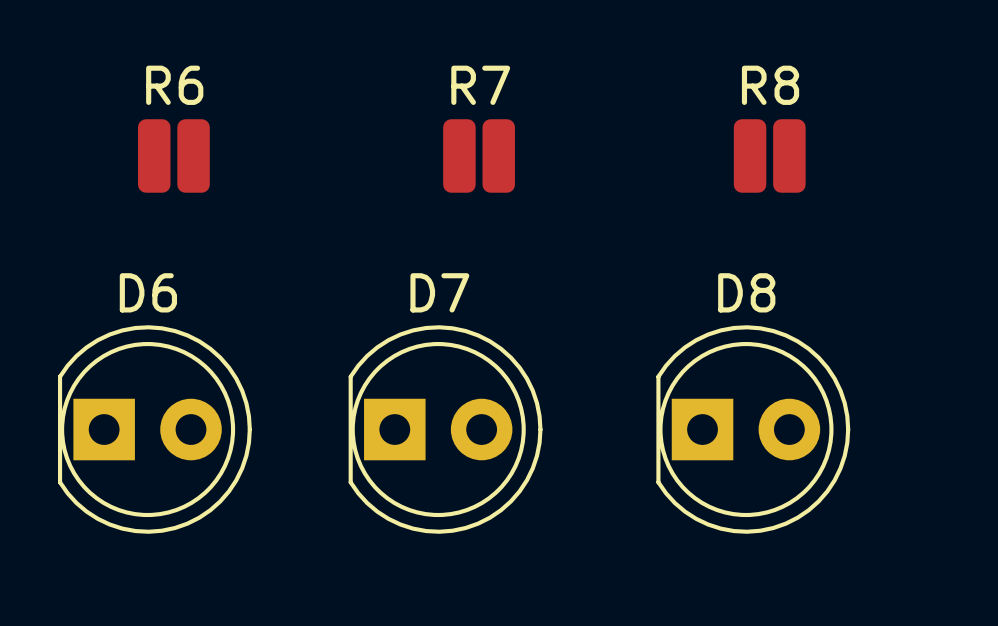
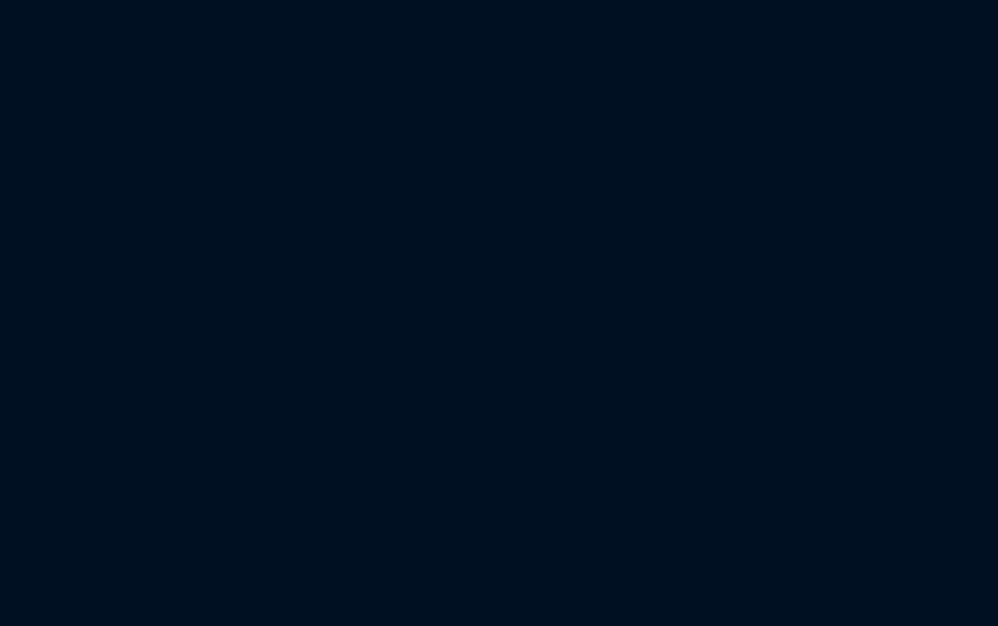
R6: (173, 155) -> none
R7: (479, 155) -> none
R8: (769, 155) -> none
D6: (154, 429) -> none
D7: (445, 429) -> none
D8: (753, 429) -> none

